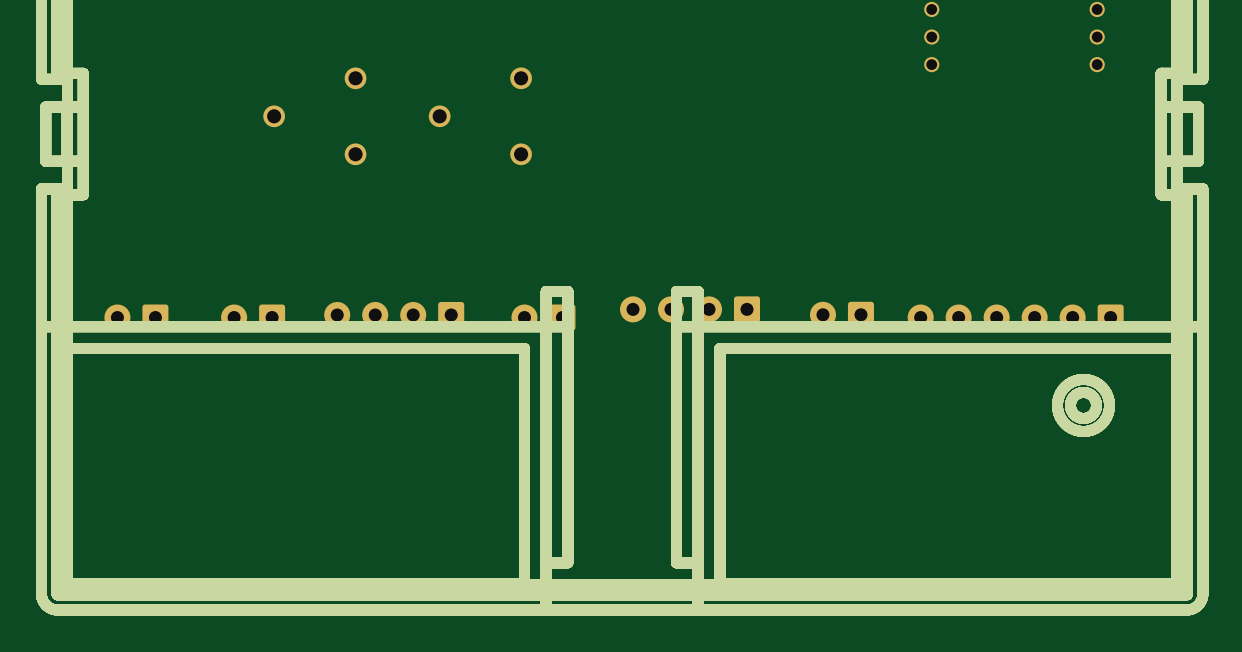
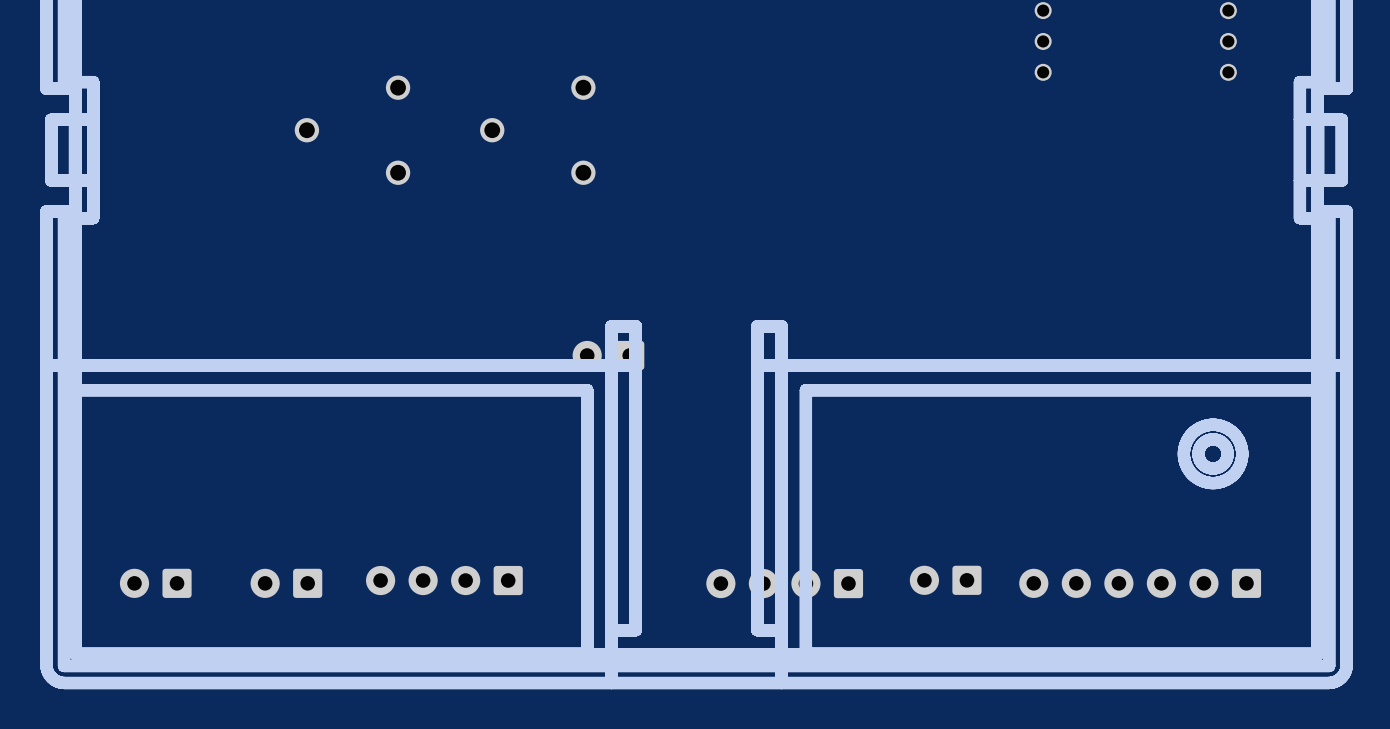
part: (690, 309) -> none
part position: (841, 314) -> (945, 580)
part: (394, 315) -> none
part: (136, 317) -> none
part: (253, 317) -> none
part position: (1015, 317) -> (1140, 583)
part: none -> (444, 580)
part: none -> (155, 583)
part: none -> (286, 583)
part: none -> (784, 583)

